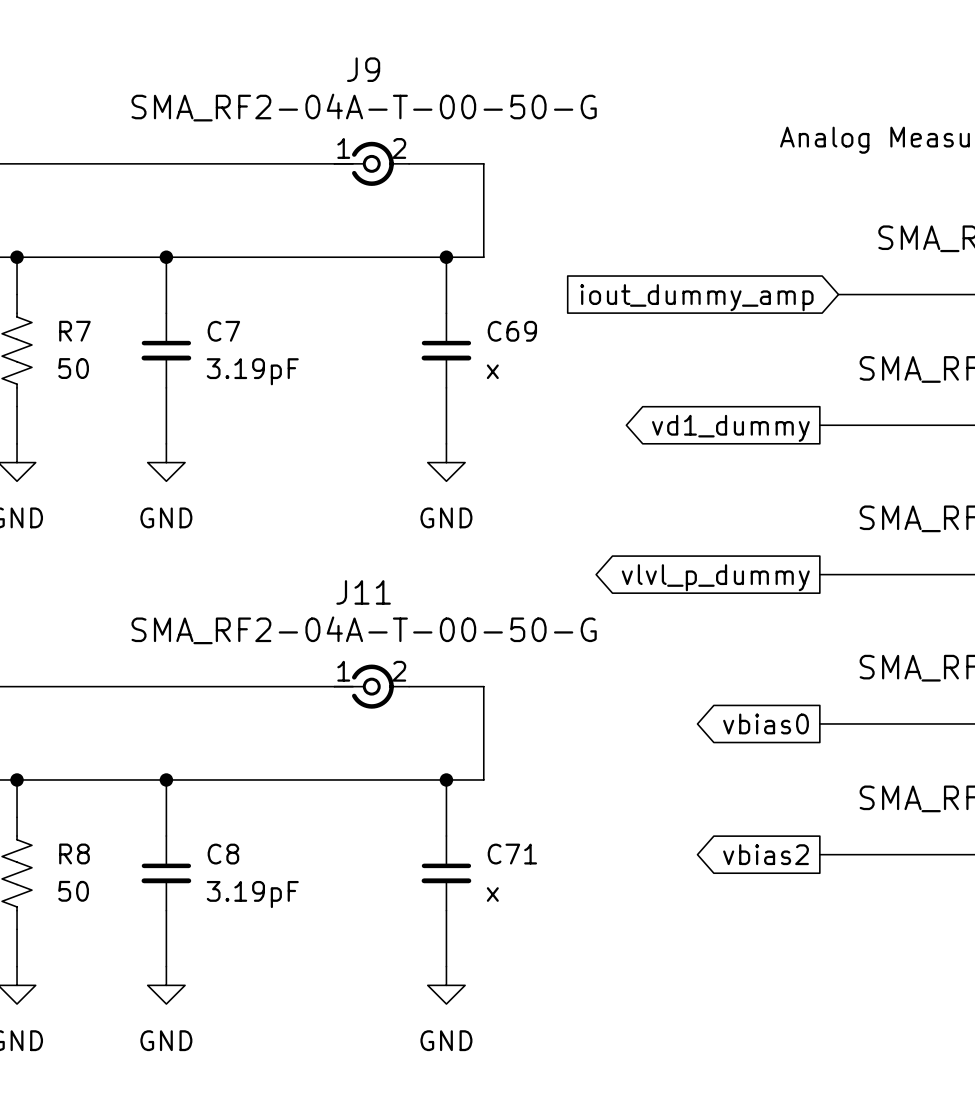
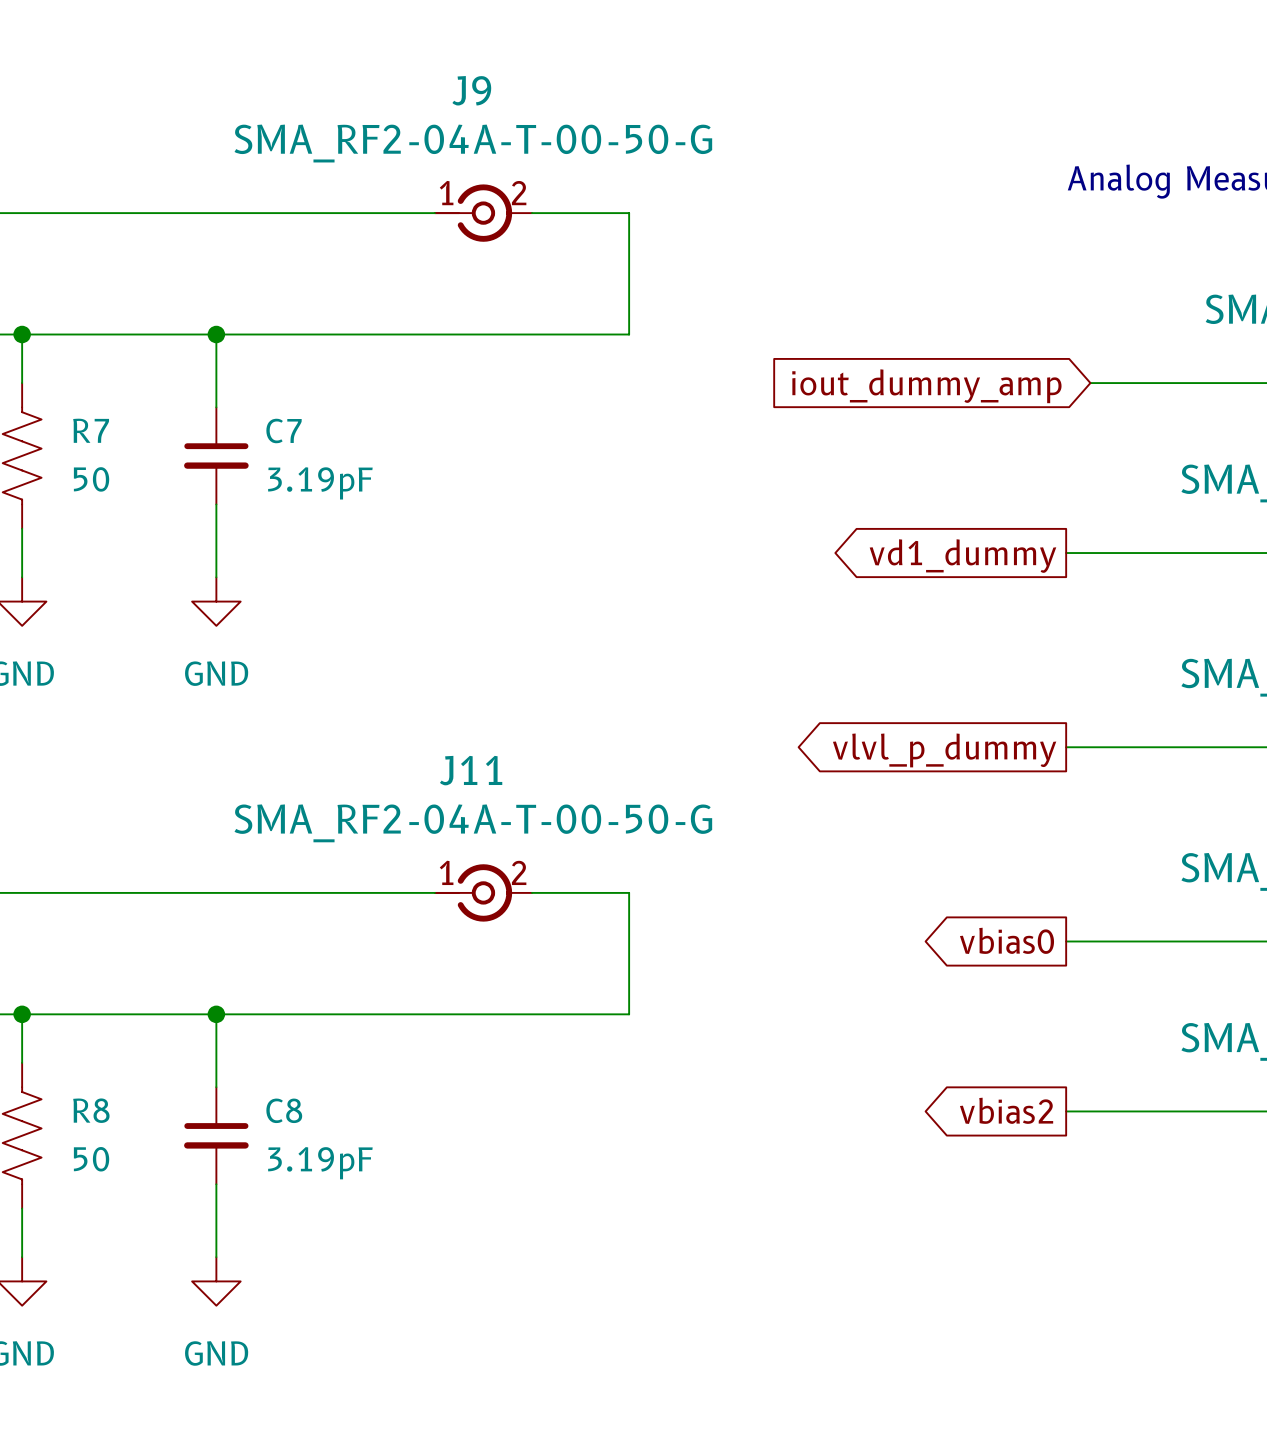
wire: (446, 257) (446, 313) -> none
junction: (446, 257) -> none
C69: x (446, 350) -> none
wire: (446, 387) (446, 443) -> none
power symbol: GND (446, 462) -> none
wire: (446, 779) (446, 836) -> none
junction: (446, 779) -> none
C71: x (446, 873) -> none
wire: (446, 910) (446, 966) -> none
power symbol: GND (446, 985) -> none

